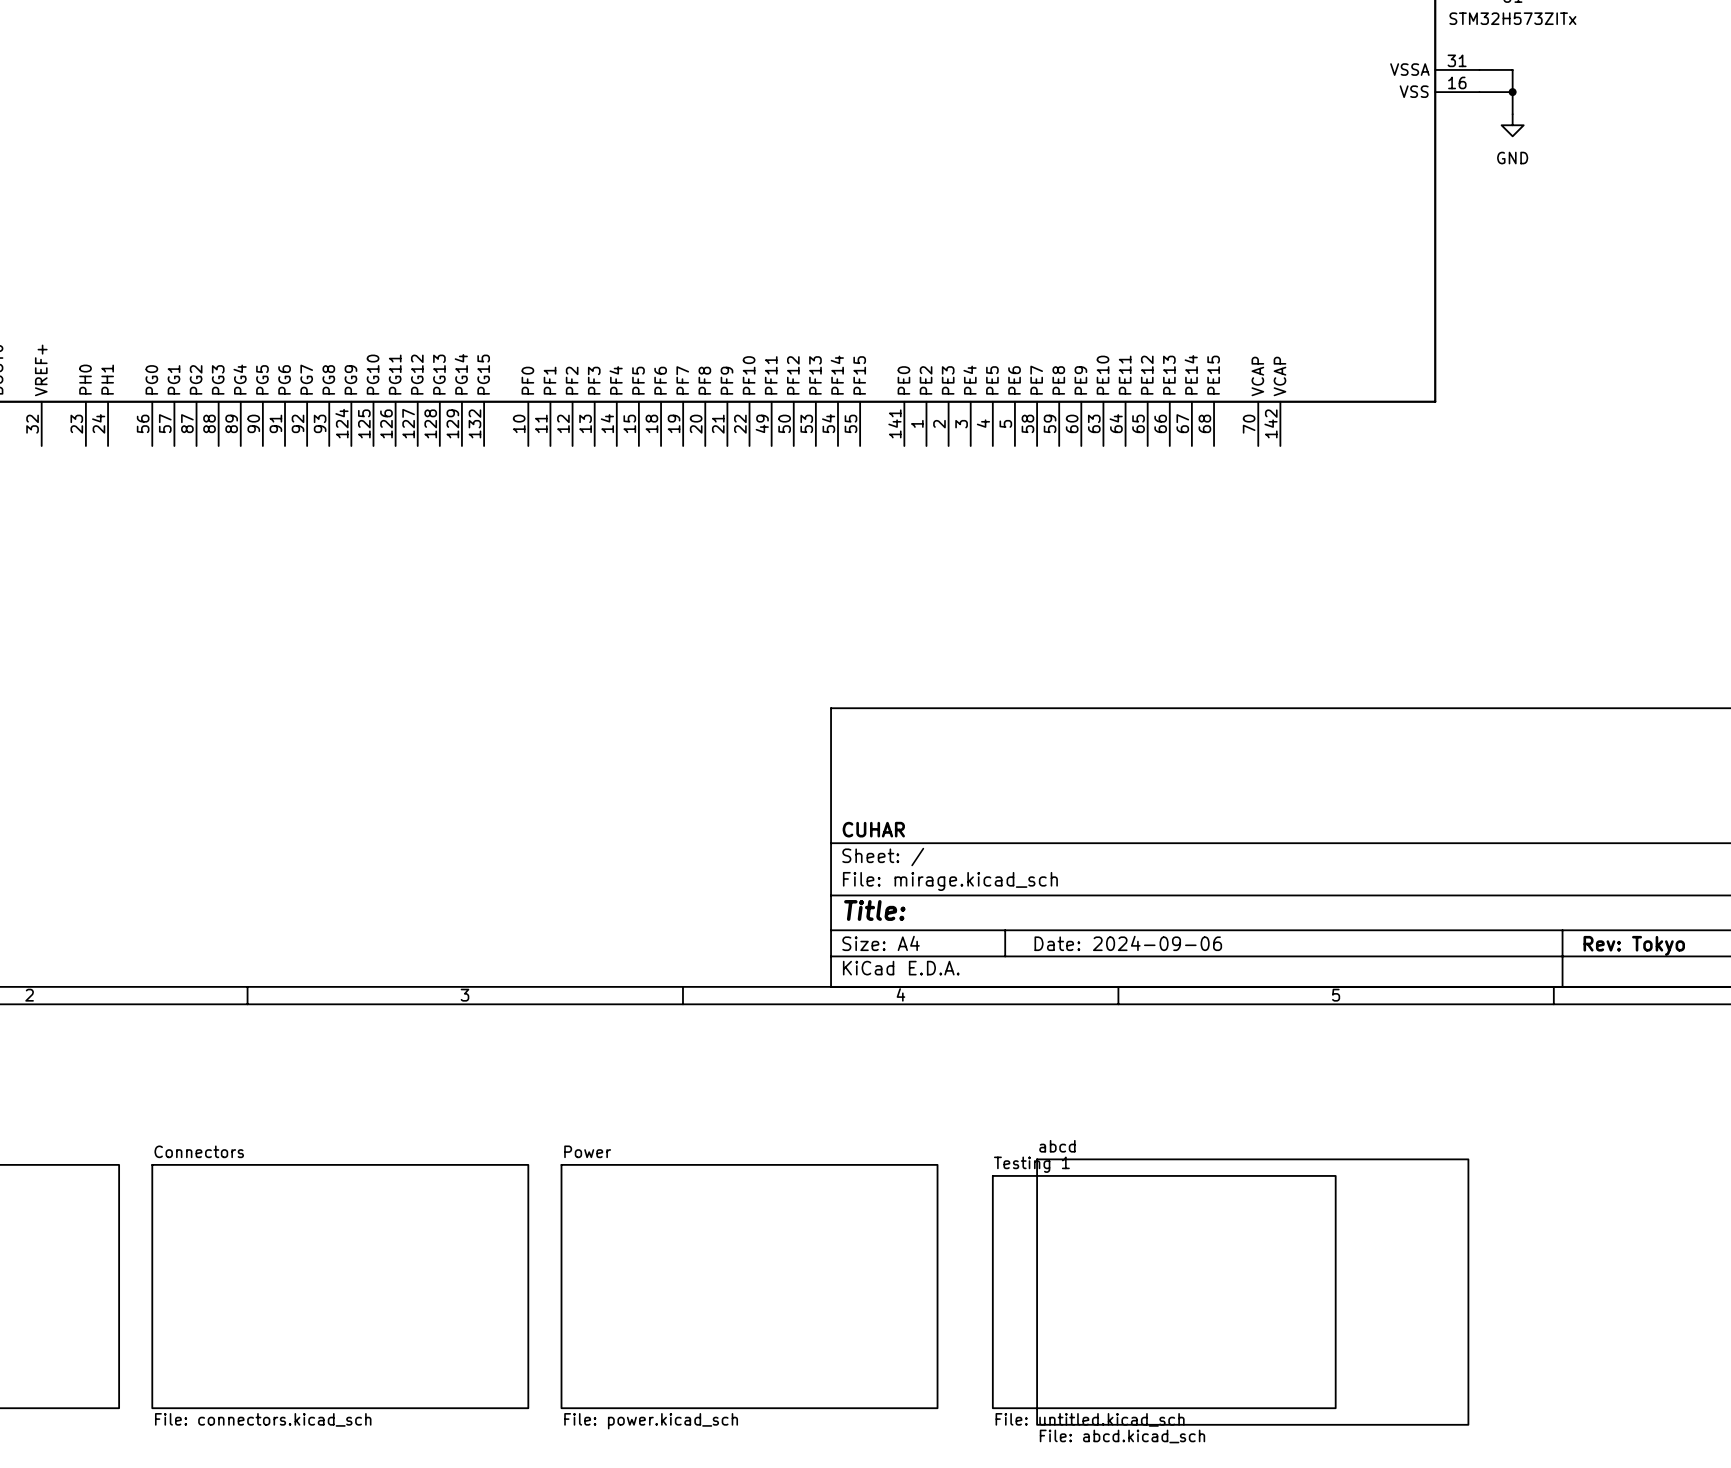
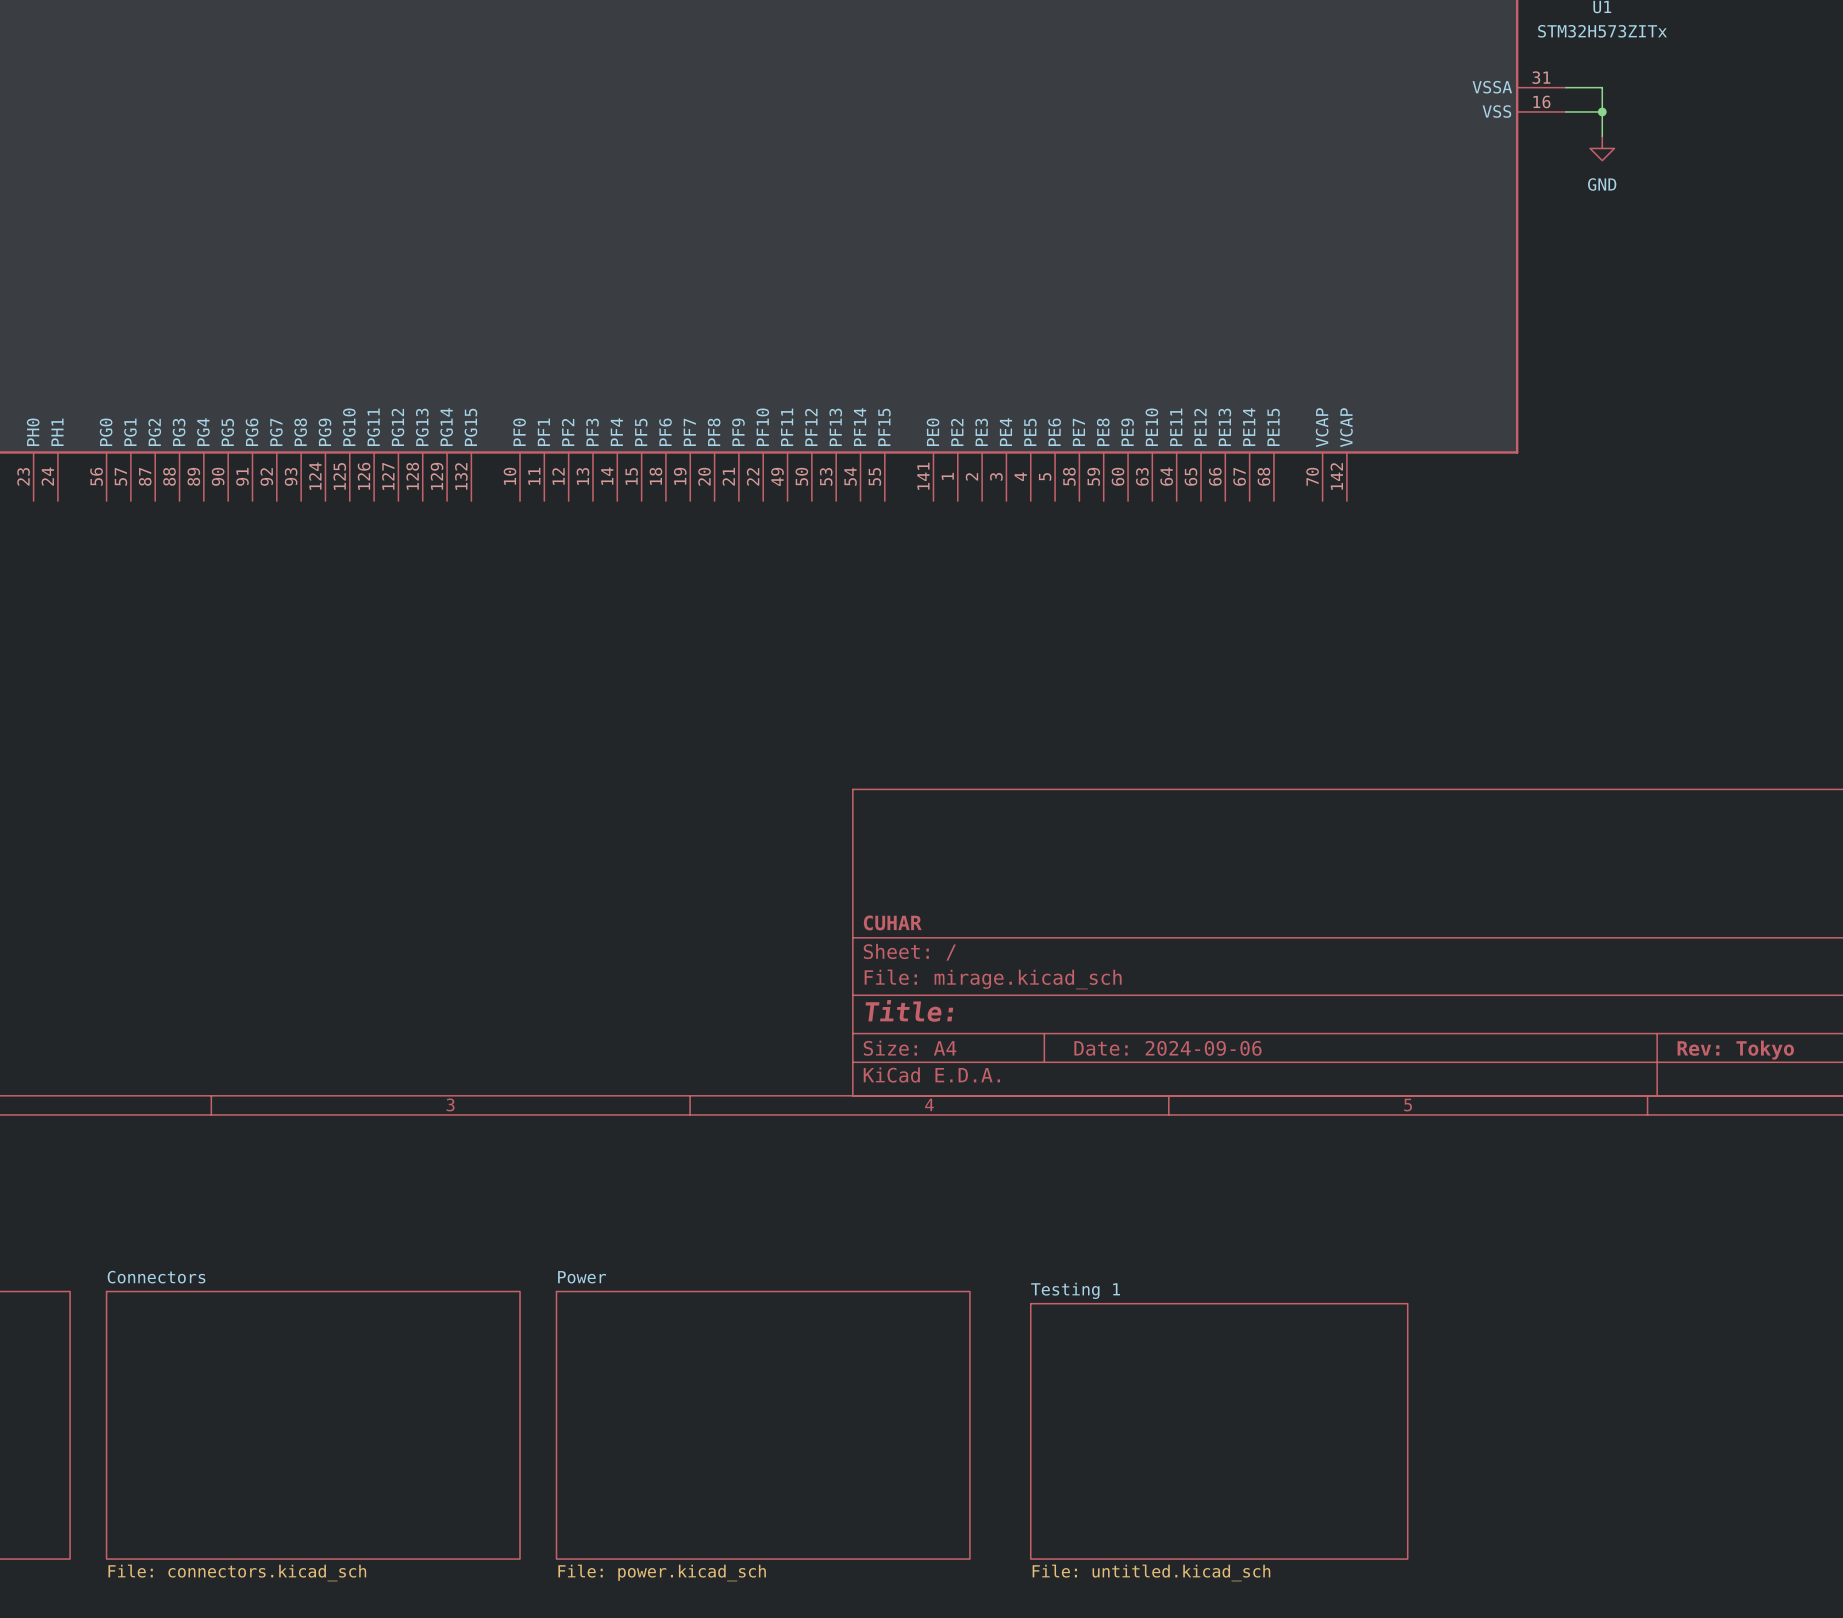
sheet abcd: File: abcd.kicad_sch (1252, 1292) -> none

